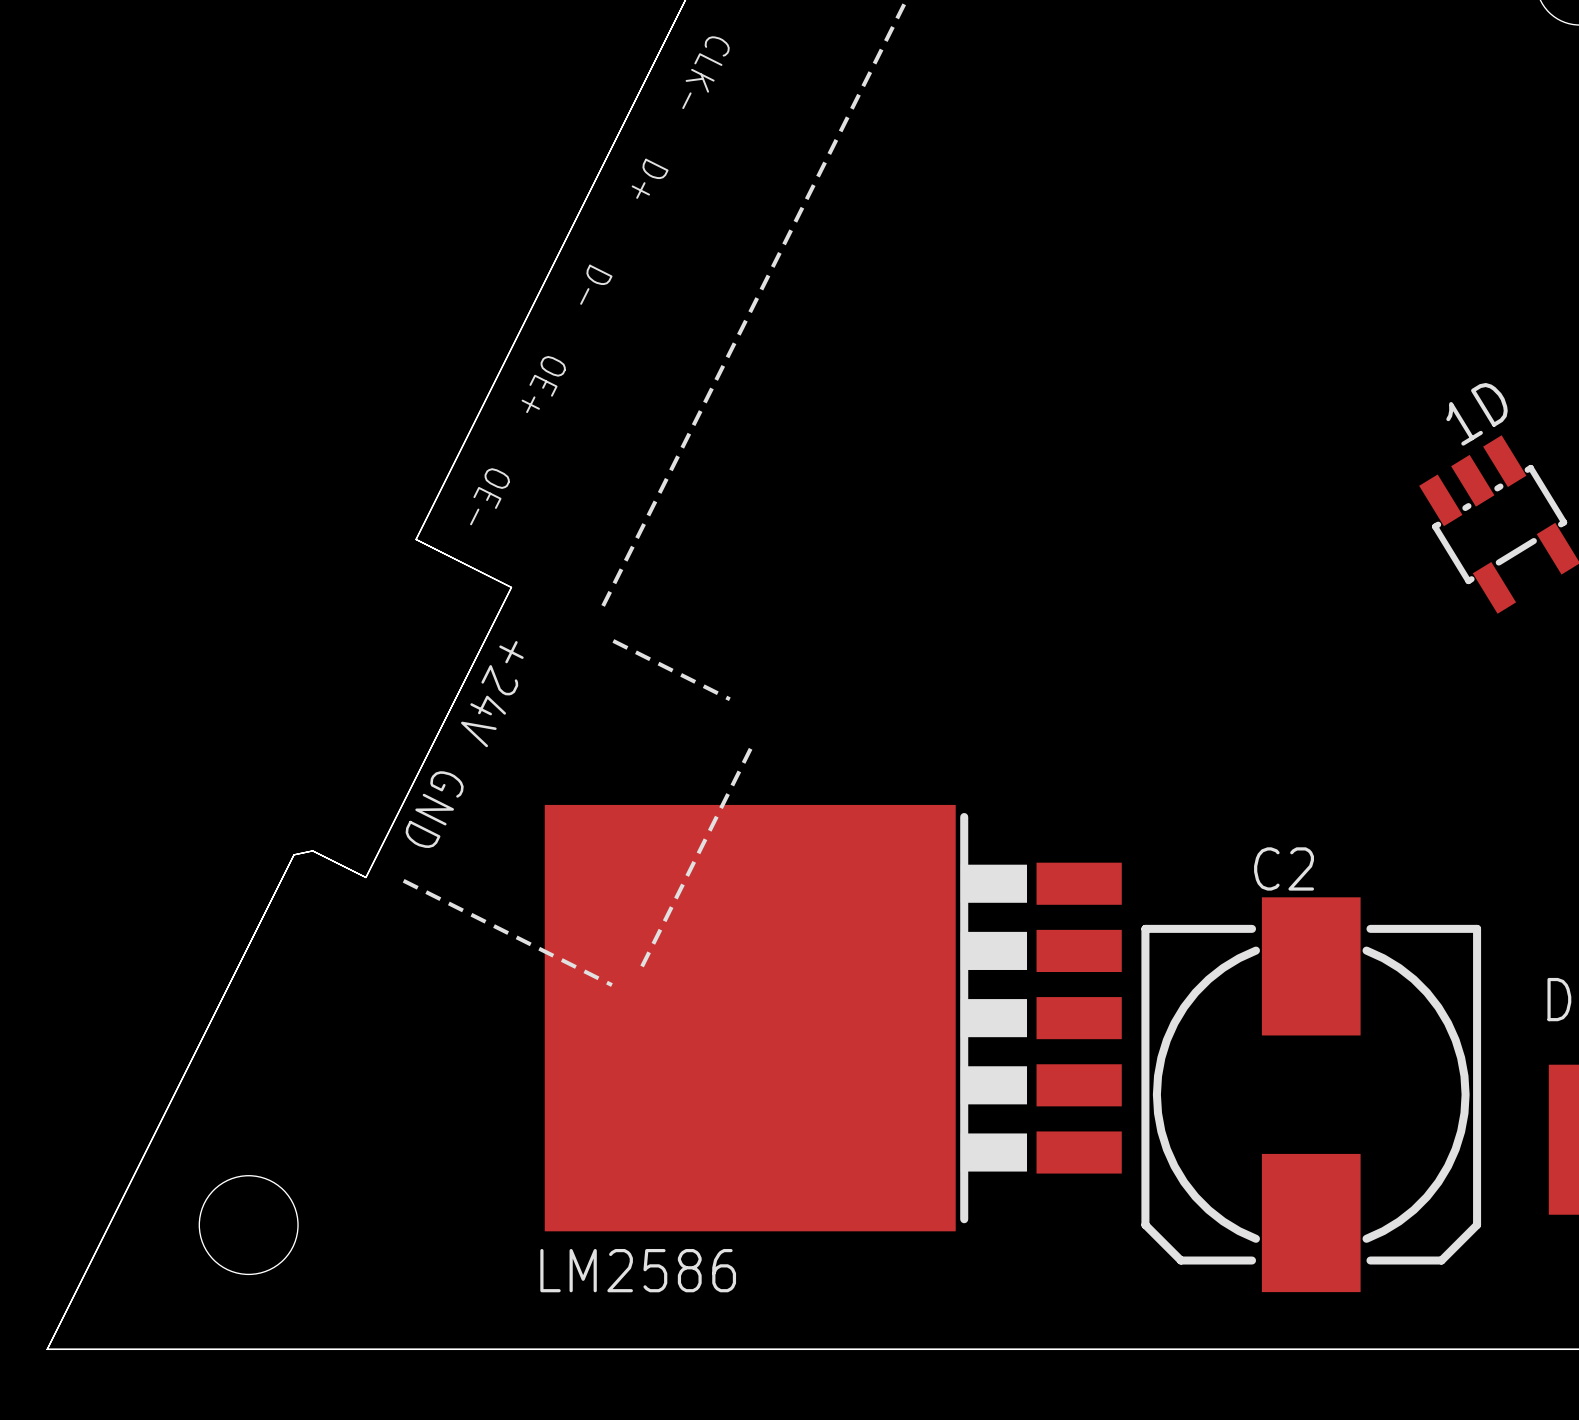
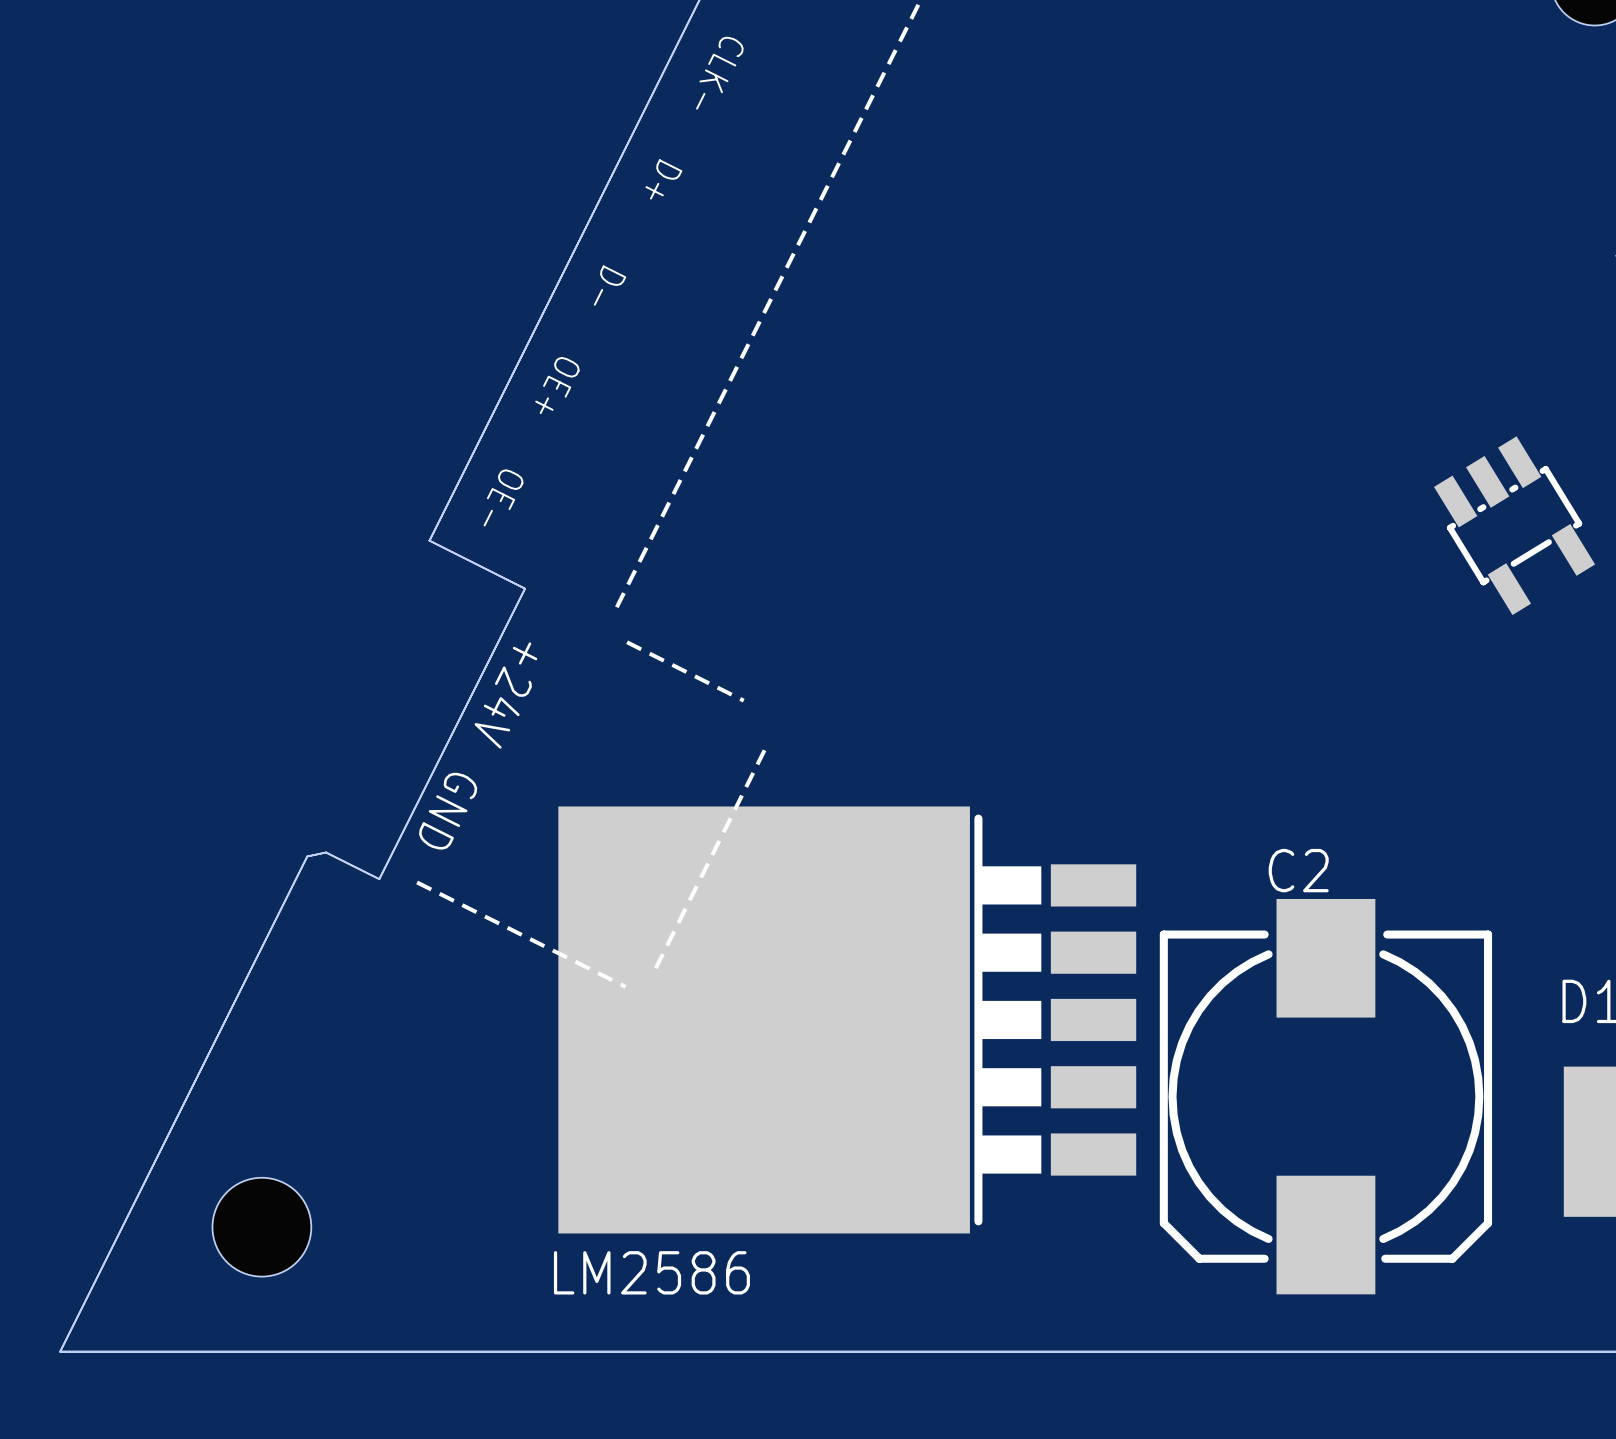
1D name: 1D (1477, 414) -> none
C2 footprint: [1141, 897, 1482, 1293] -> [1159, 898, 1493, 1295]

